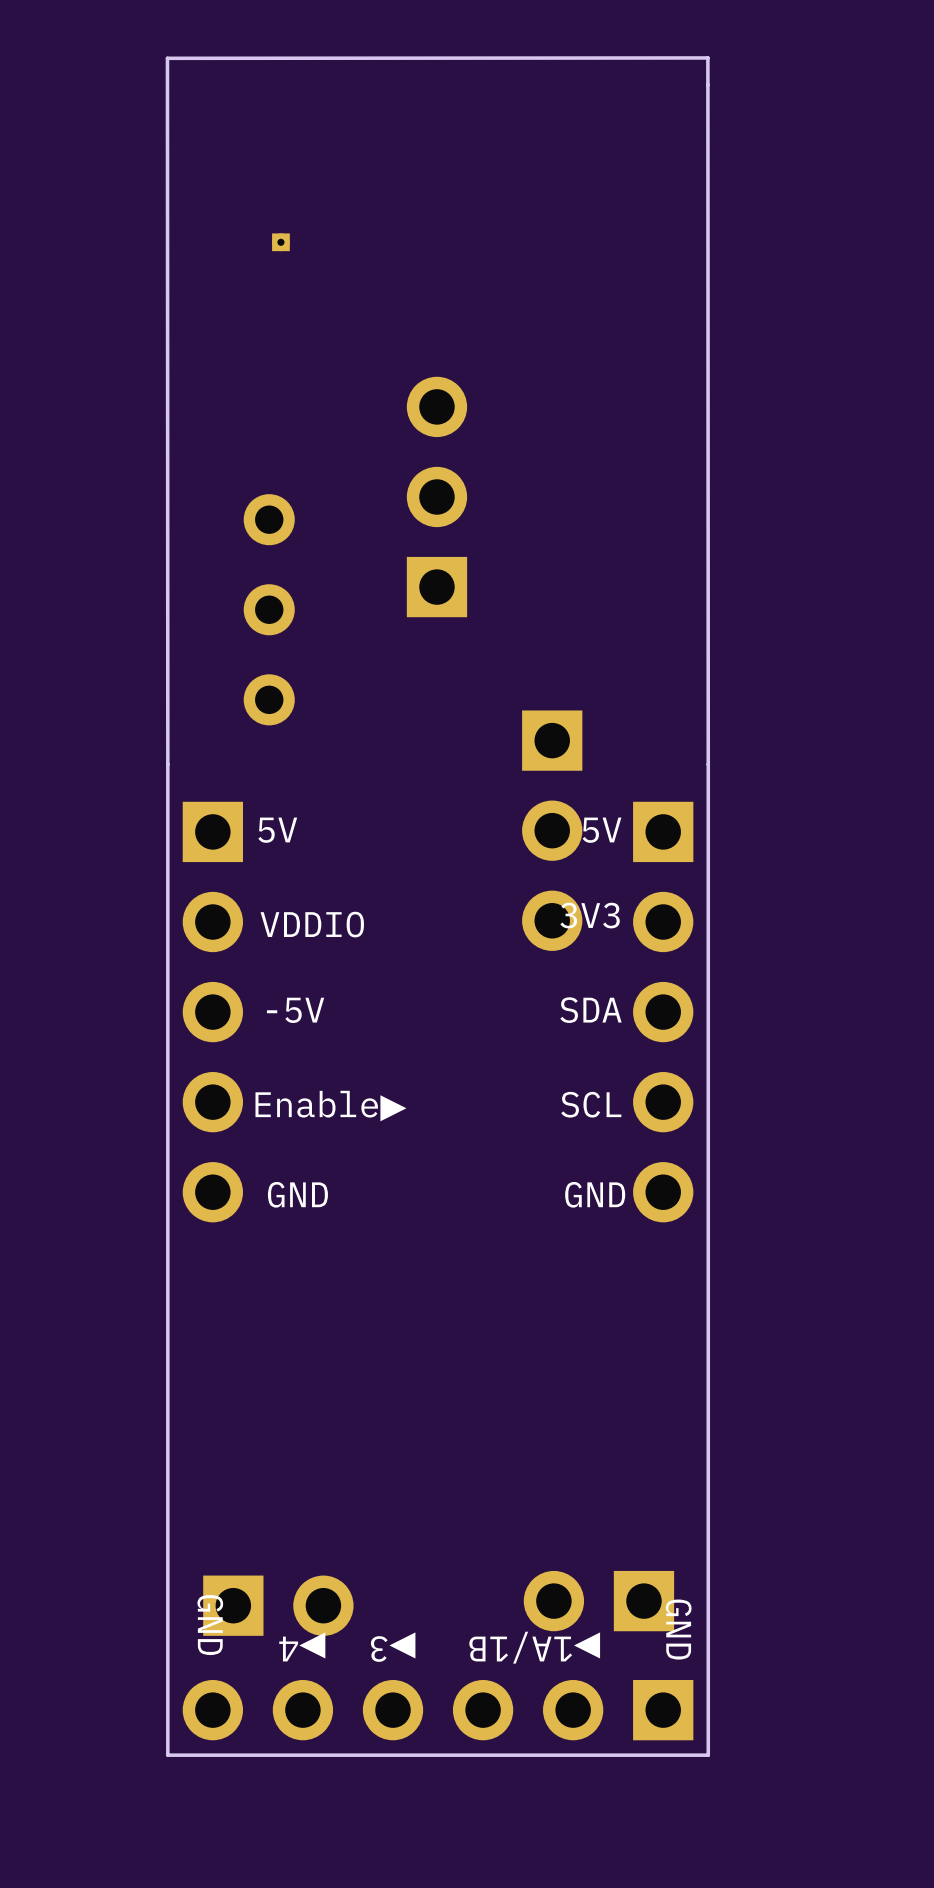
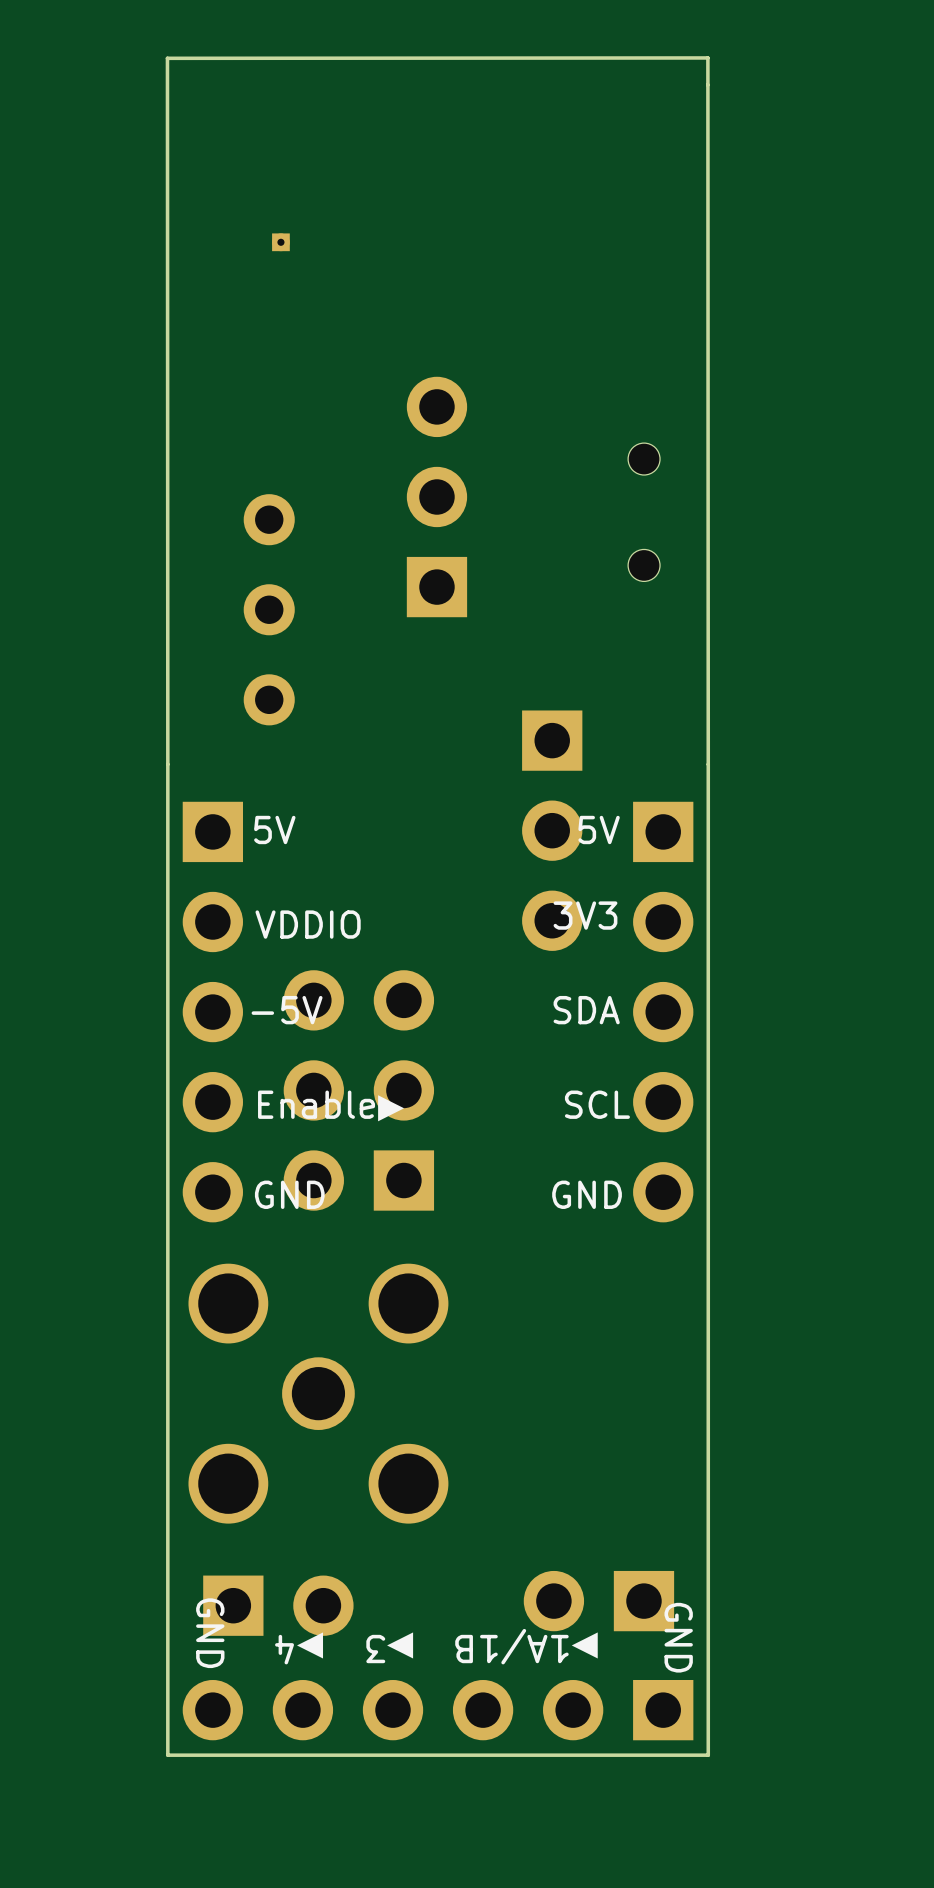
part: none -> (644, 512)
part: none -> (358, 1090)
part: none -> (318, 1393)

